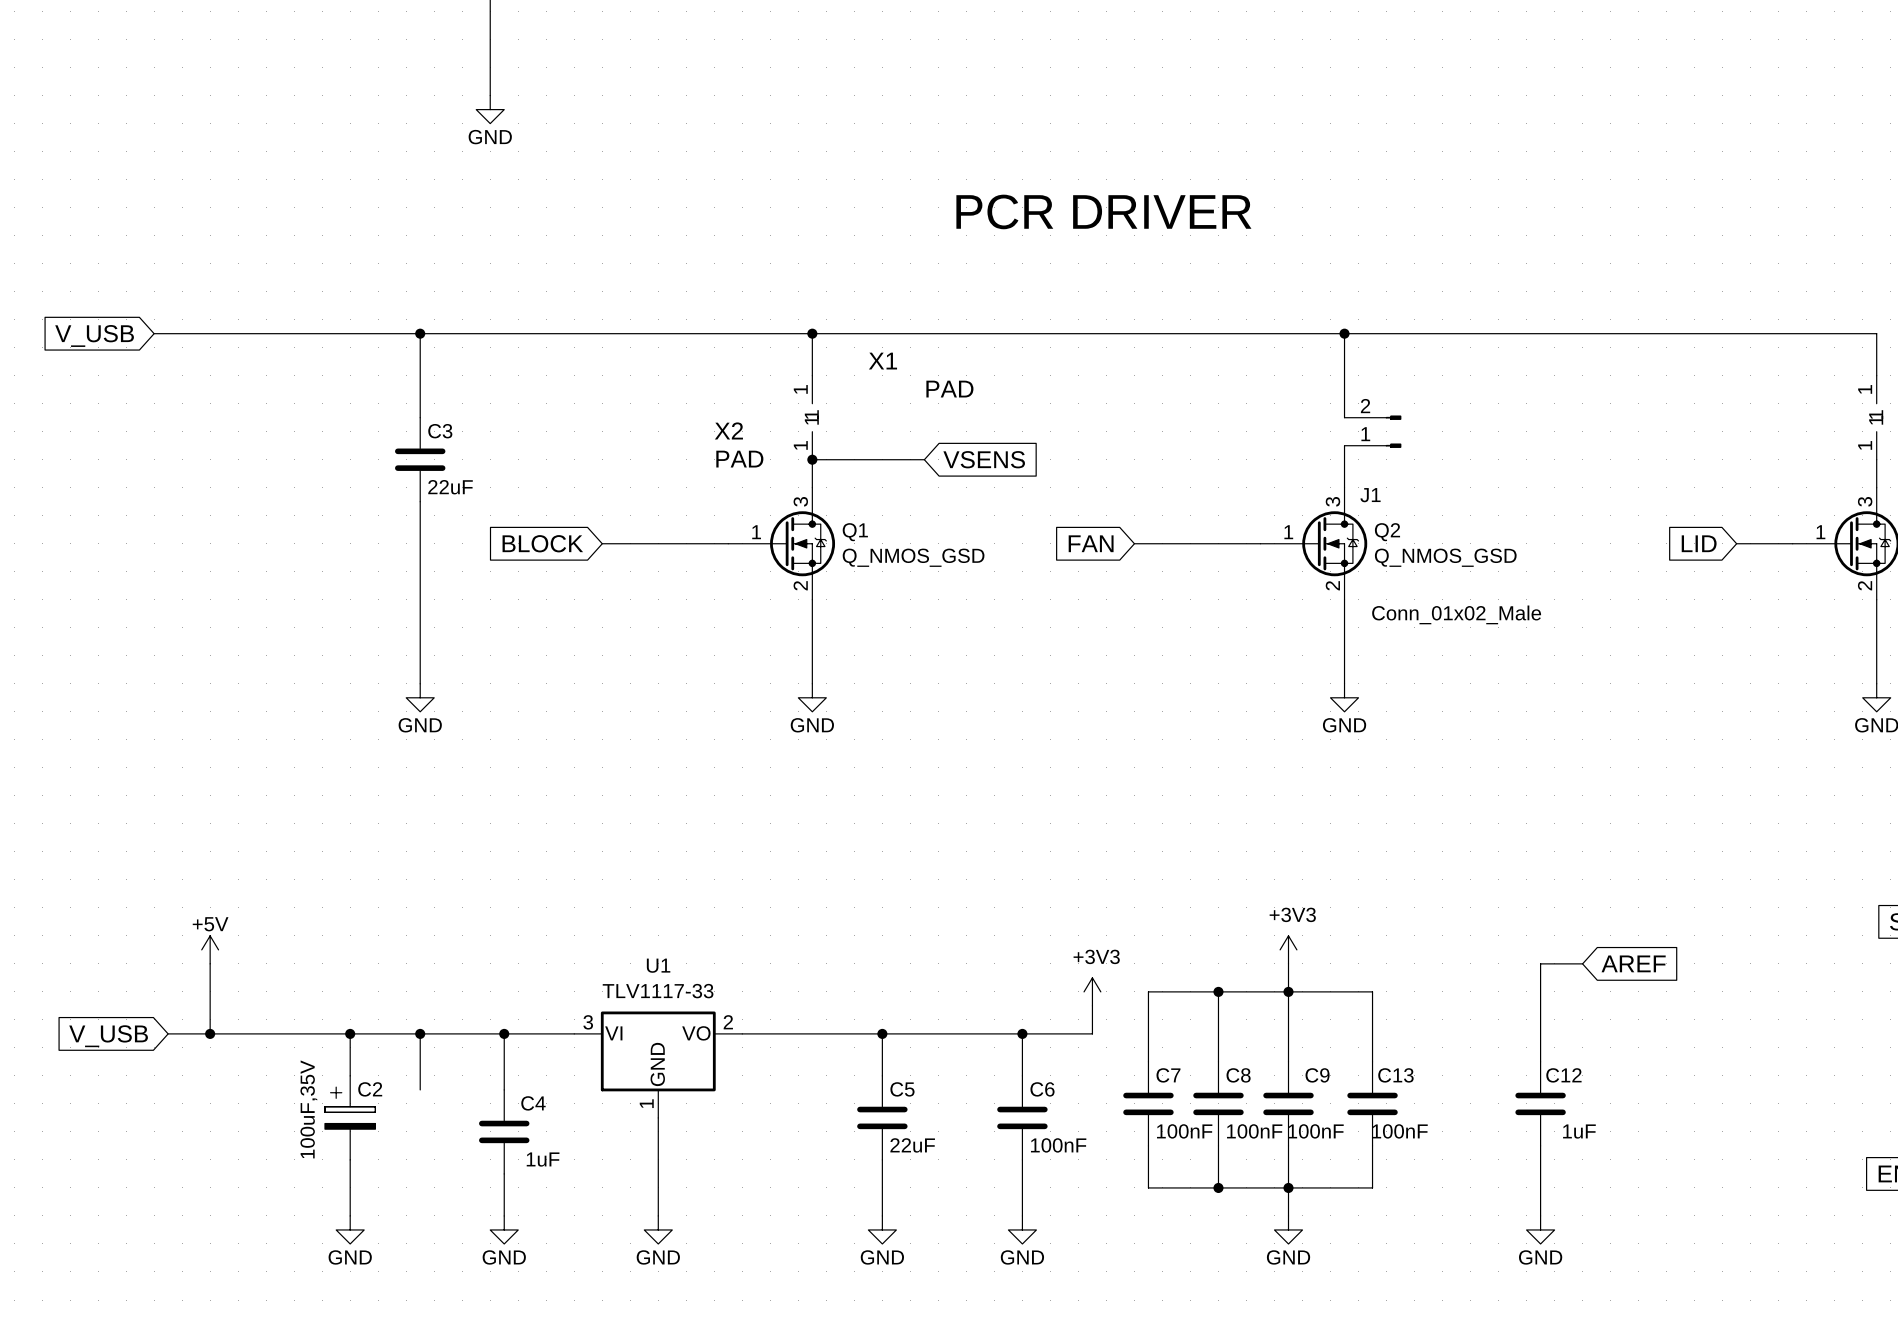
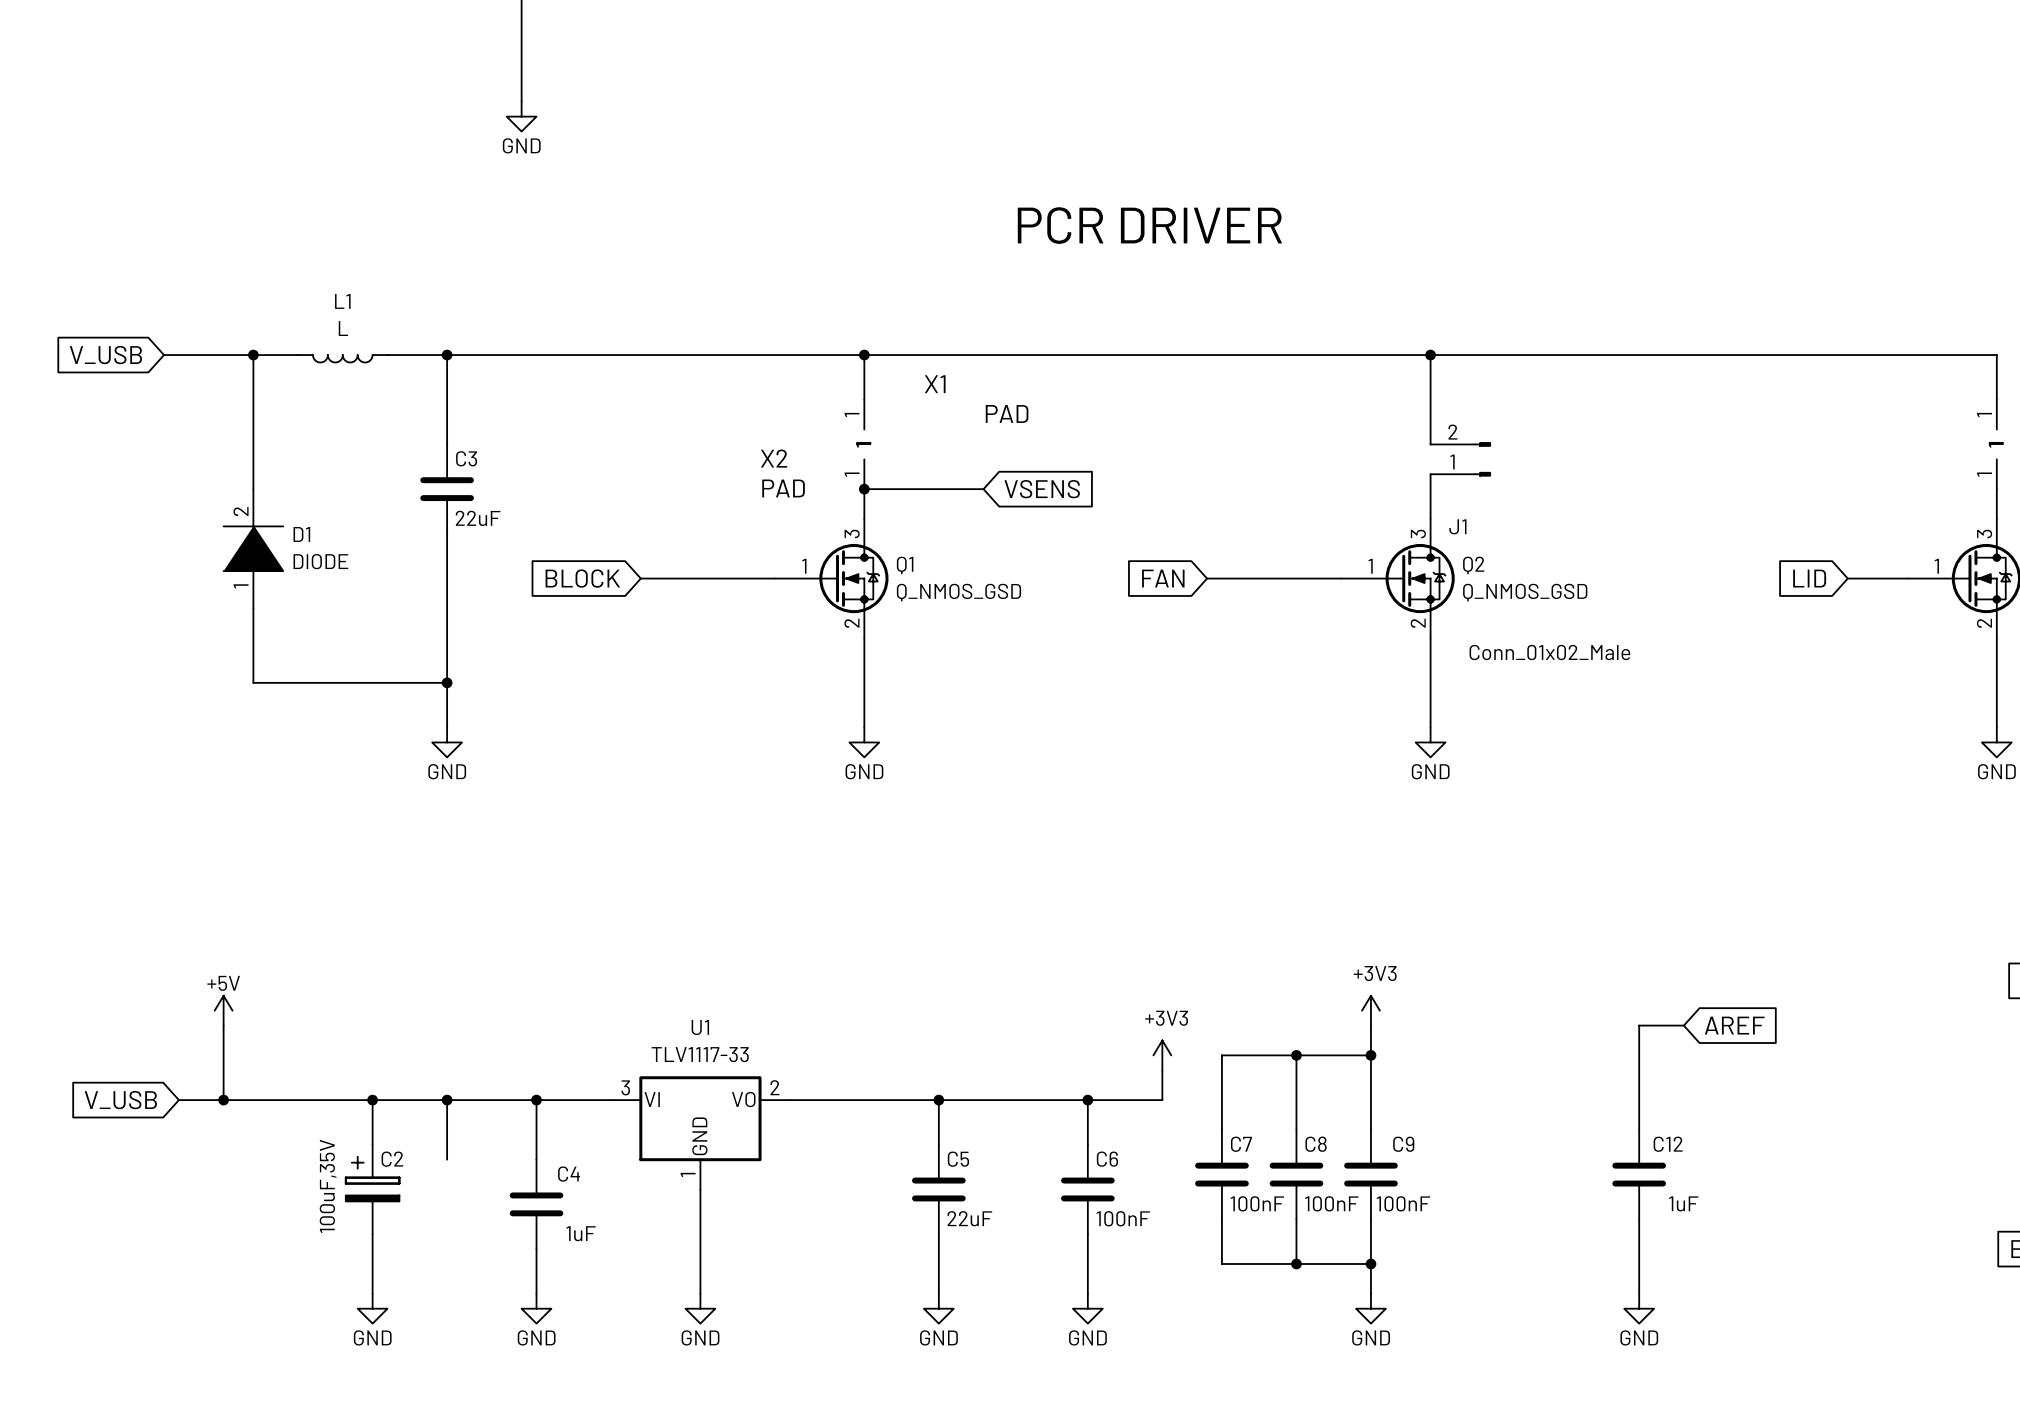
wire: none -> (253, 355) (253, 489)
junction: none -> (253, 355)
wire: (280, 333) (364, 333) -> none
L1: none -> L (342, 358)
D1: none -> DIODE (253, 548)
wire: none -> (253, 608) (253, 682) (447, 682)
junction: none -> (447, 682)
wire: (1288, 991) (1372, 991) (1372, 1061) -> none
C13: 100nF (1372, 1103) -> none
wire: (1372, 1145) (1372, 1187) (1288, 1187) -> none

